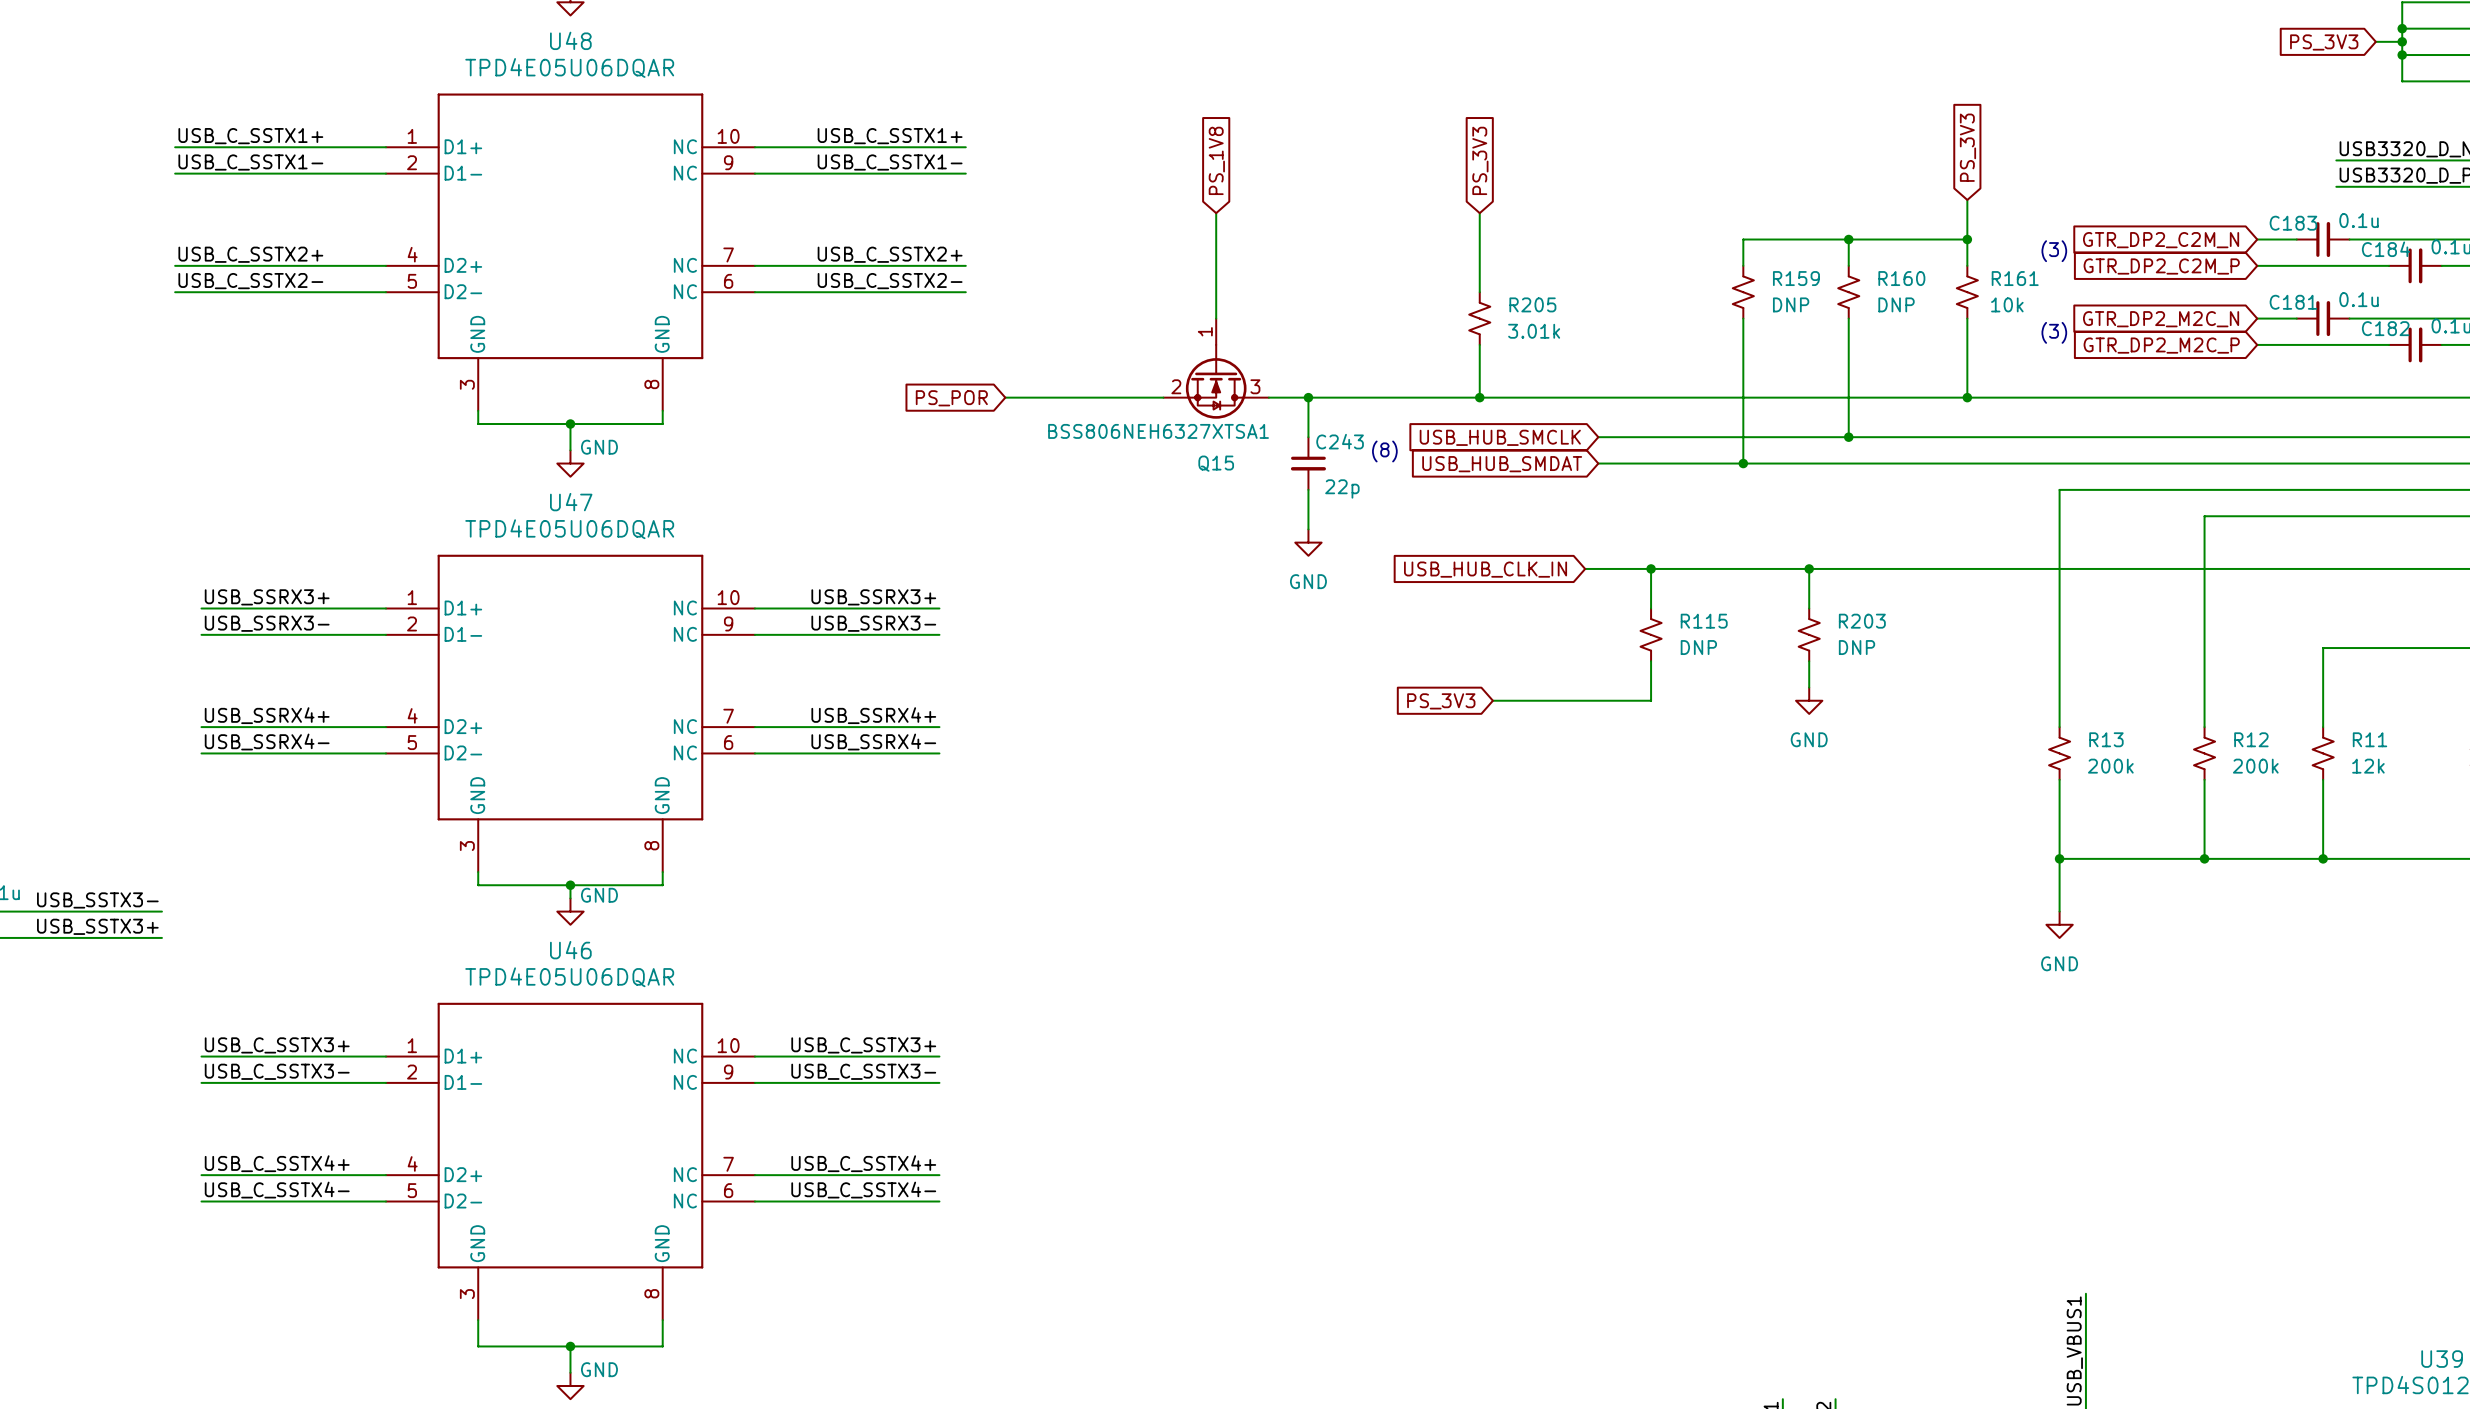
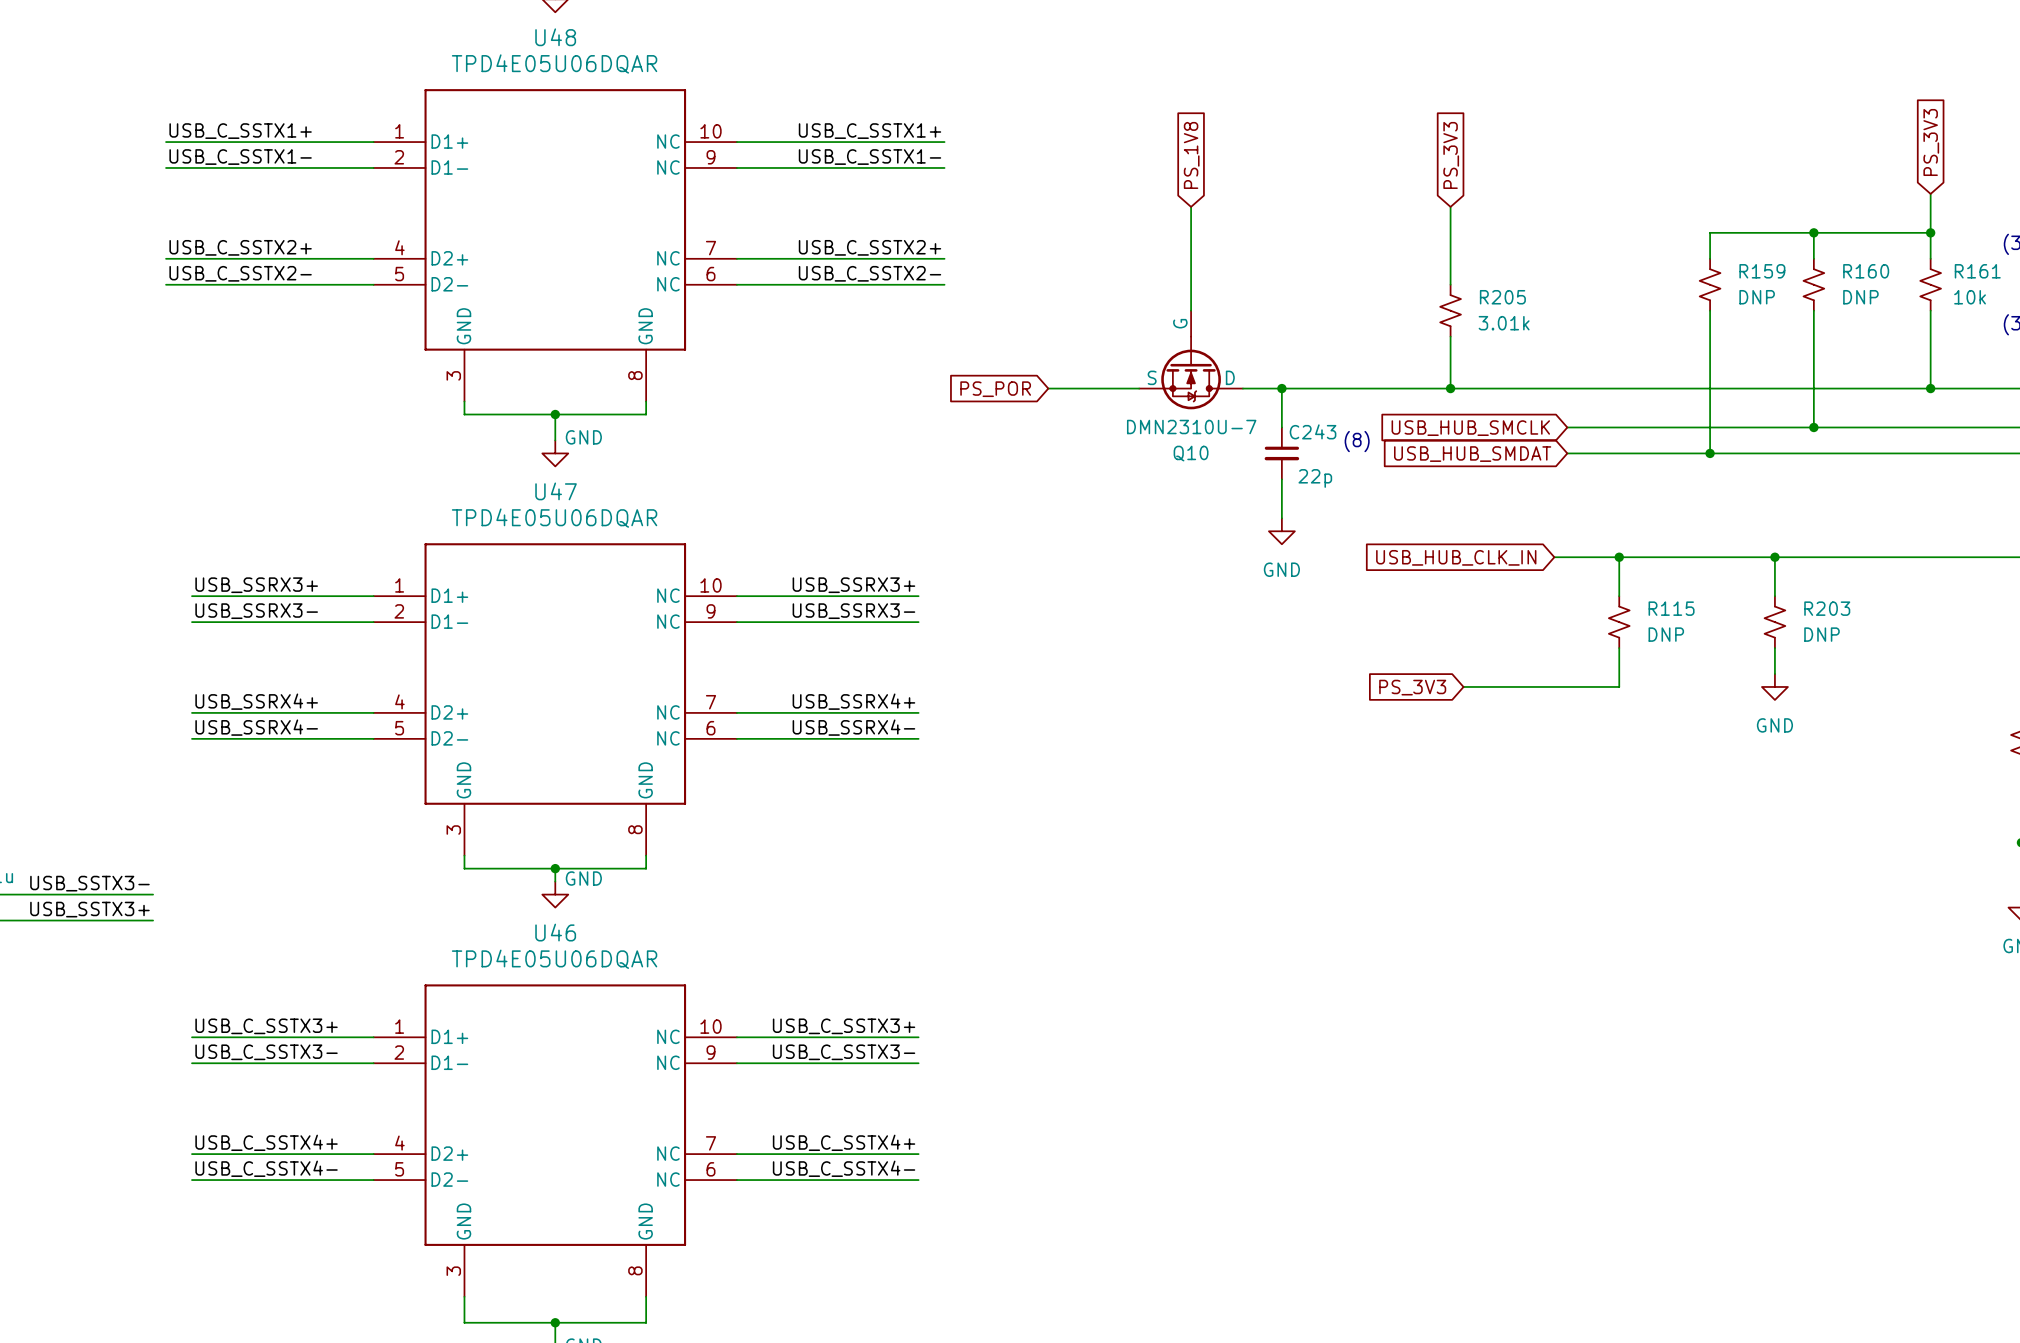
Q15: BSS806NEH6327XTSA1 (1216, 368) -> none
Q10: none -> DMN2310U-7 (1191, 360)
wire: (1005, 397) (1071, 397) -> none
global label position: PS_POR (951, 398) -> PS_POR (995, 389)

